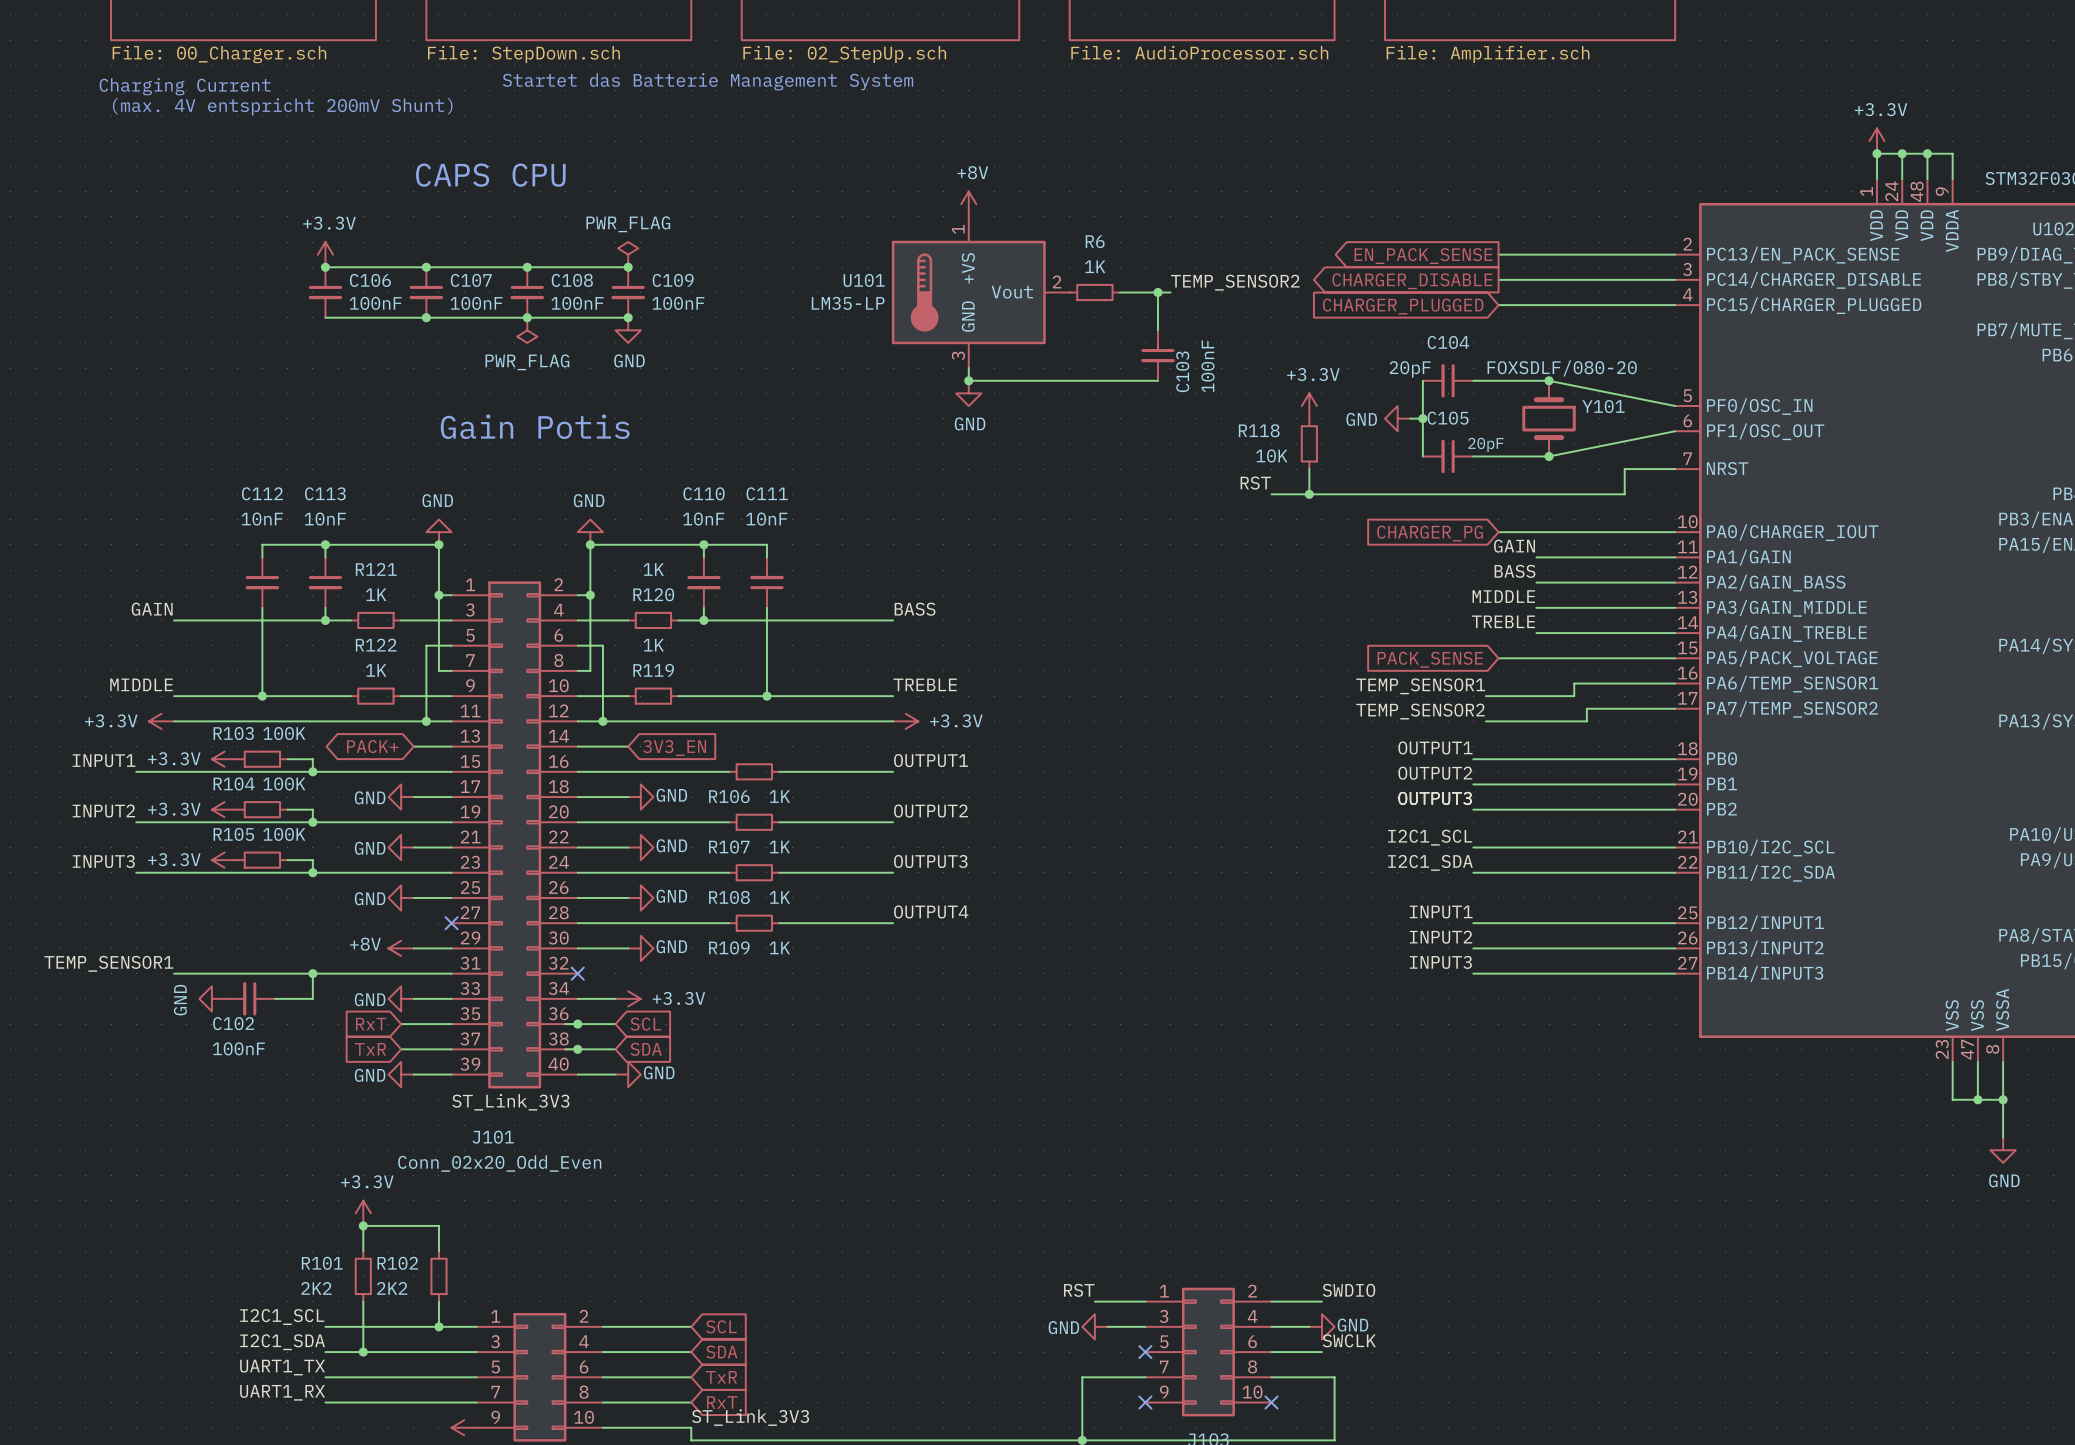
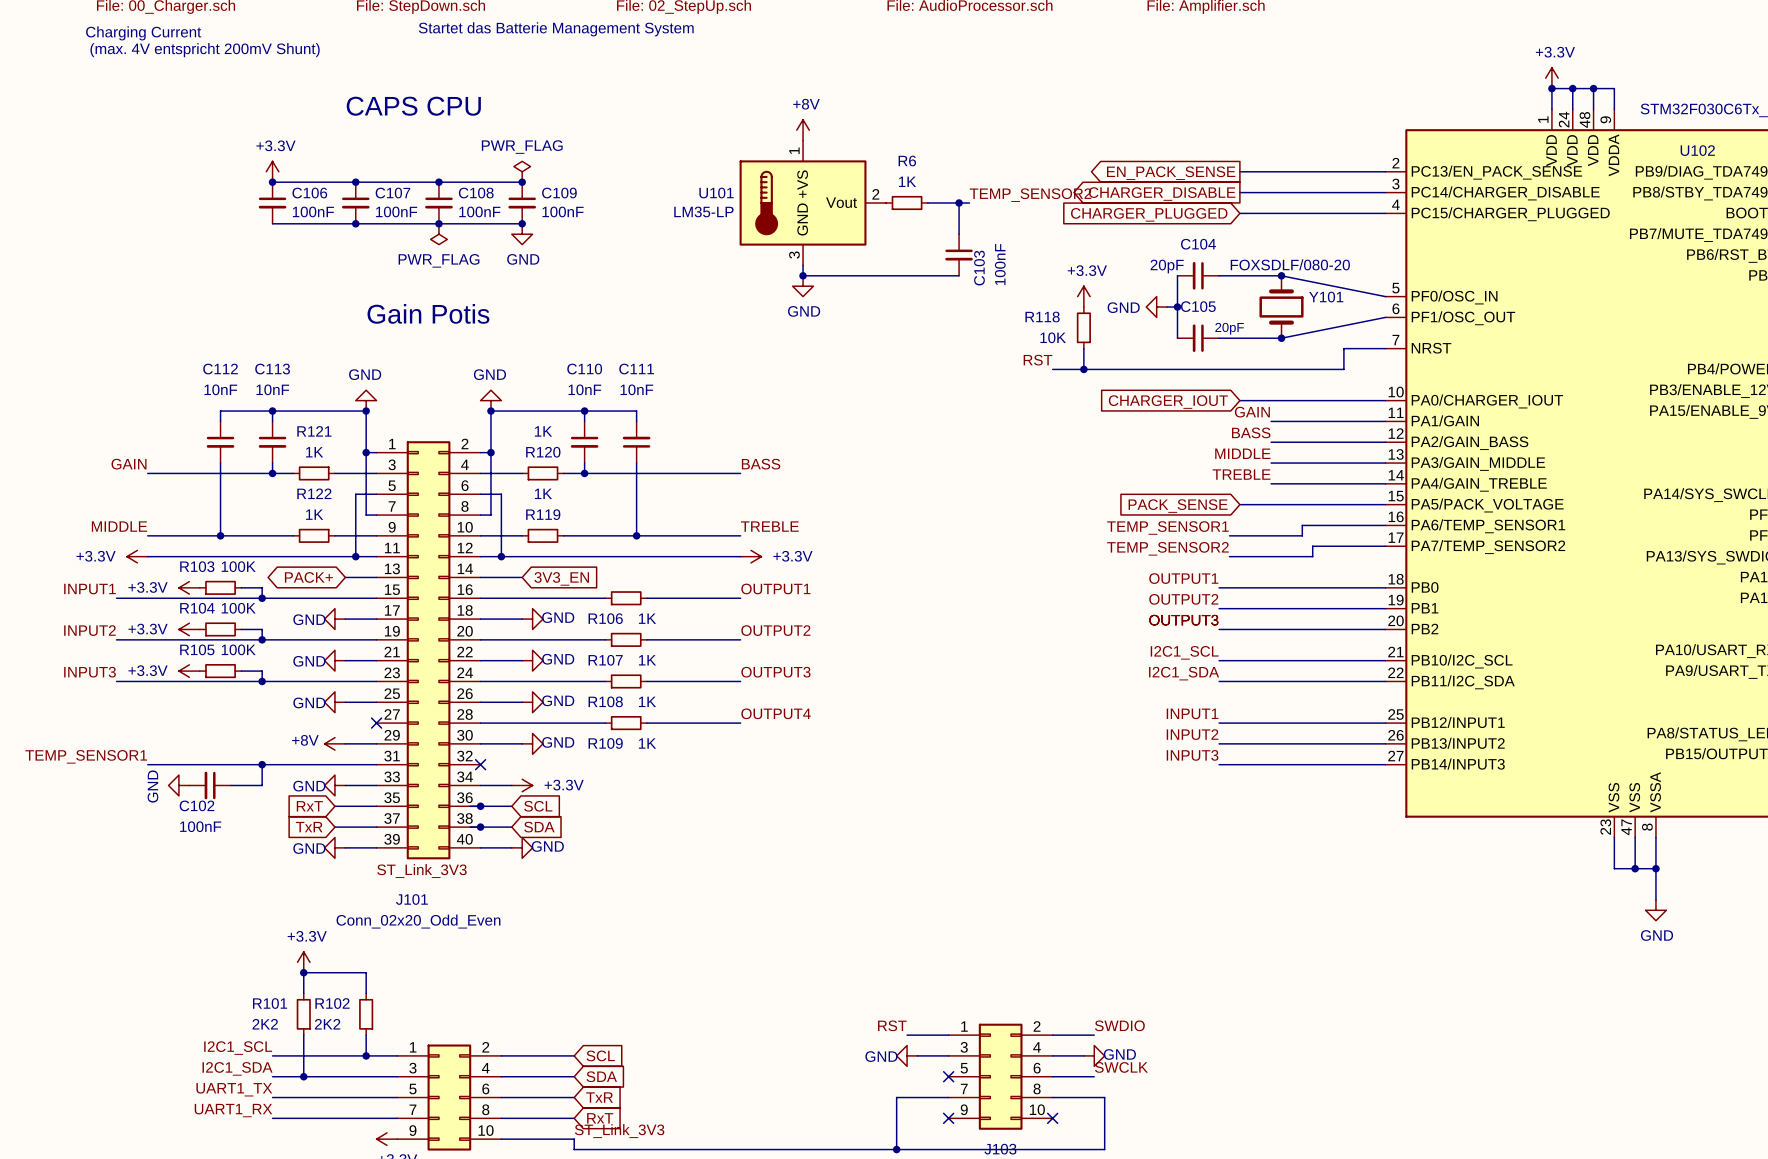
global label: CHARGER_PG (1430, 533) -> CHARGER_IOUT (1168, 402)

